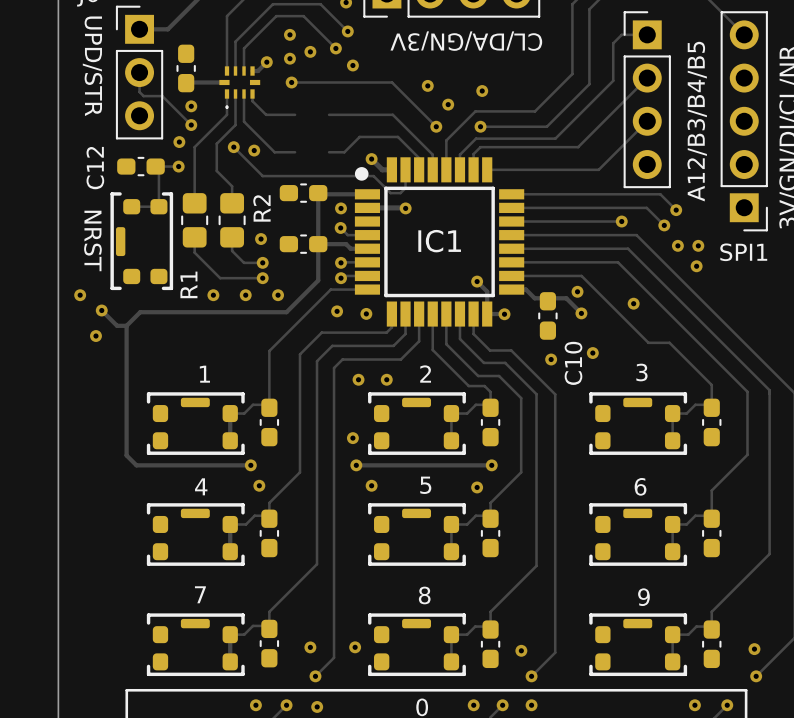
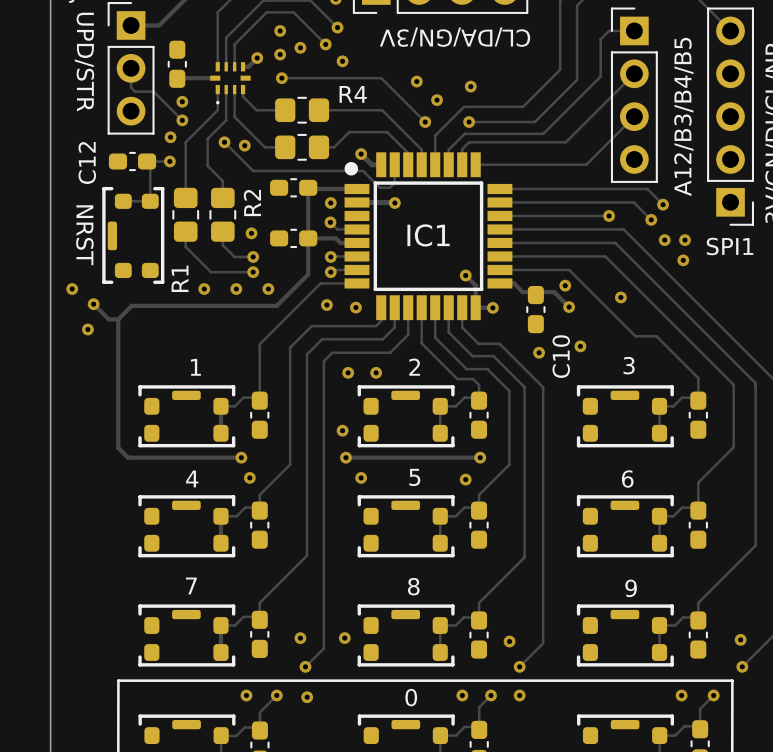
R4: none -> (302, 110)
part: none -> (302, 147)

